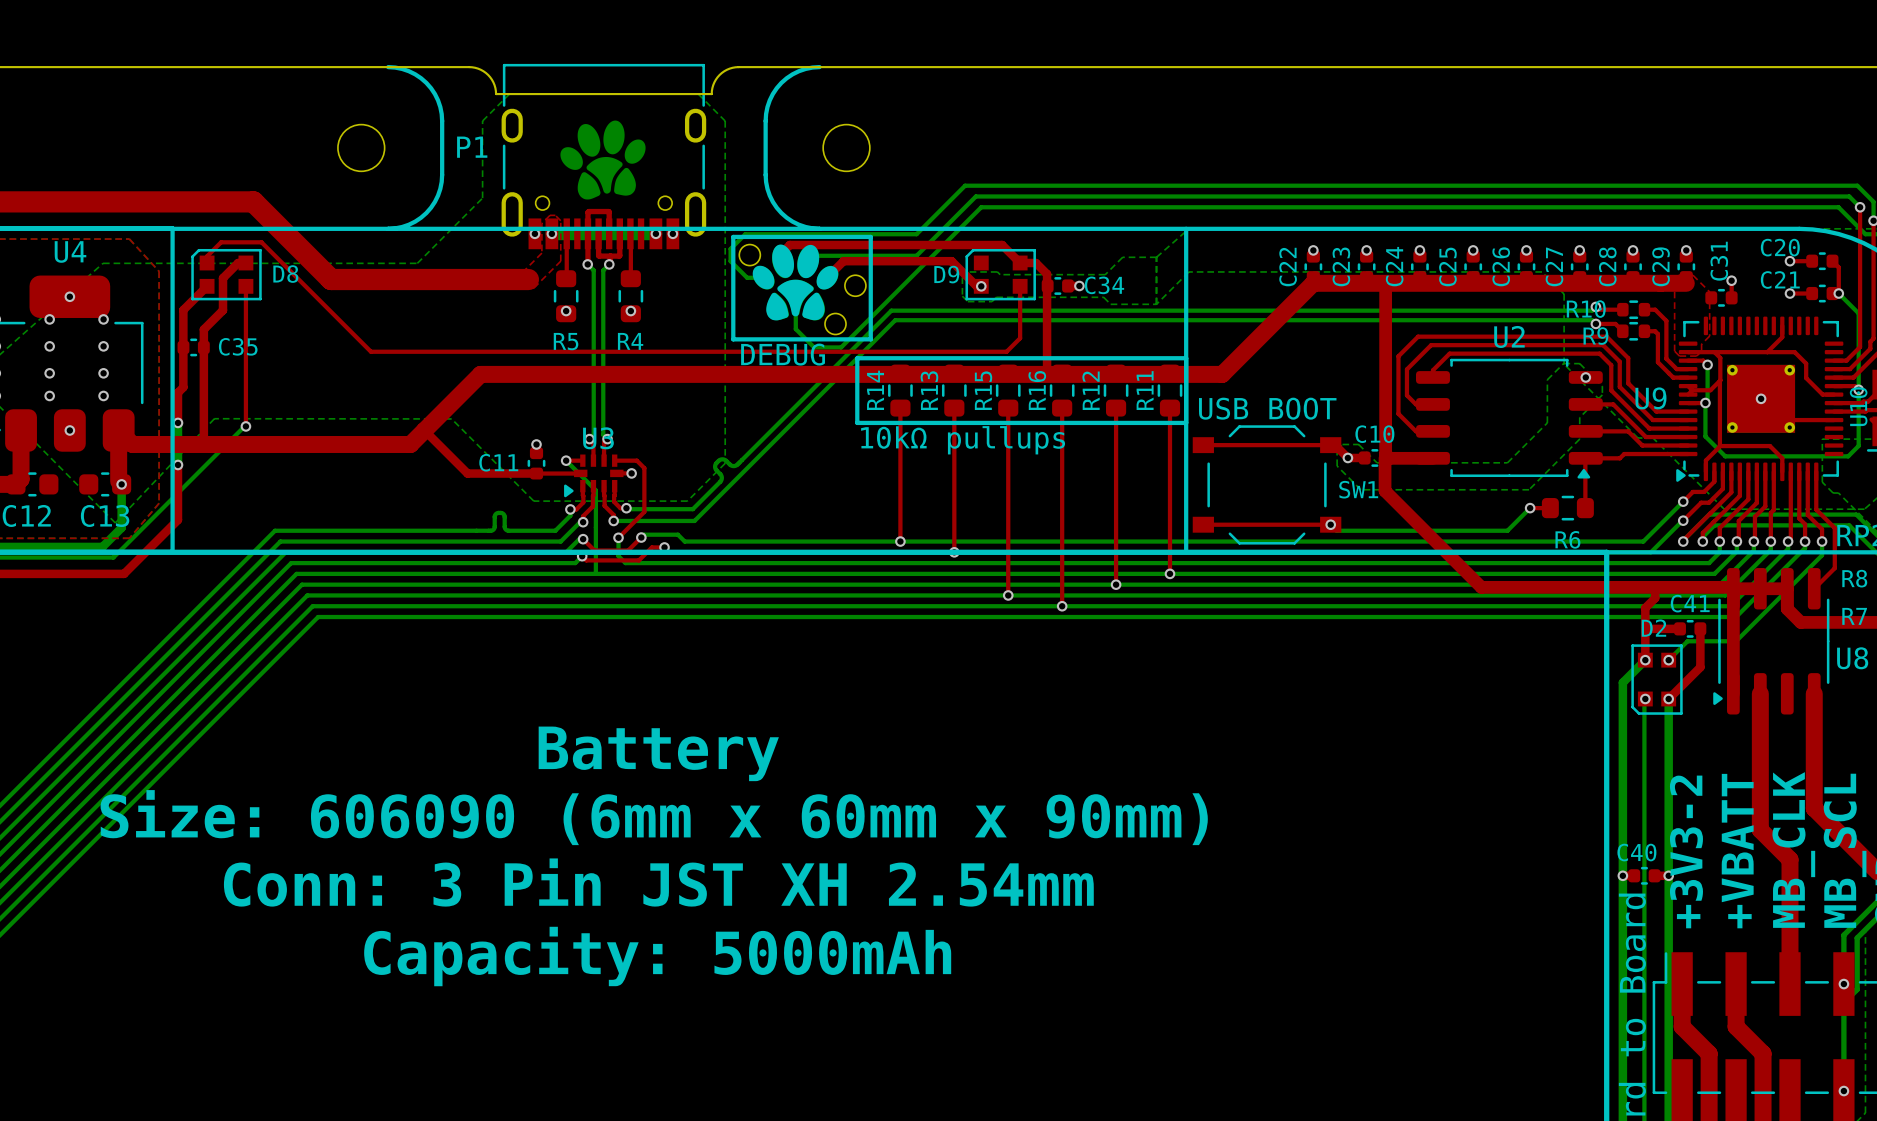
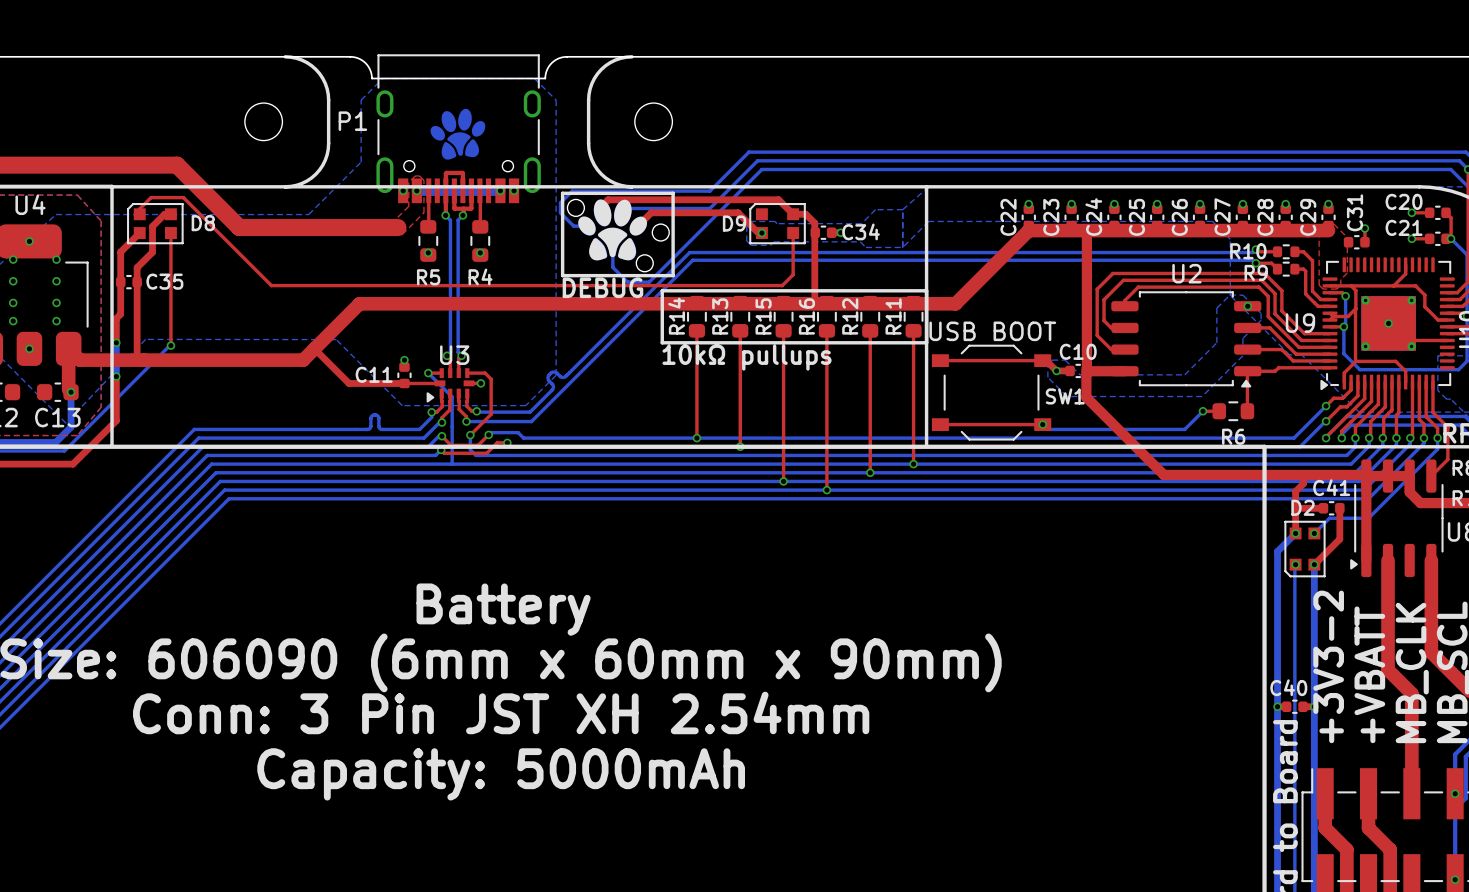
drawing shape: [560, 120, 646, 200] -> [430, 108, 486, 160]

